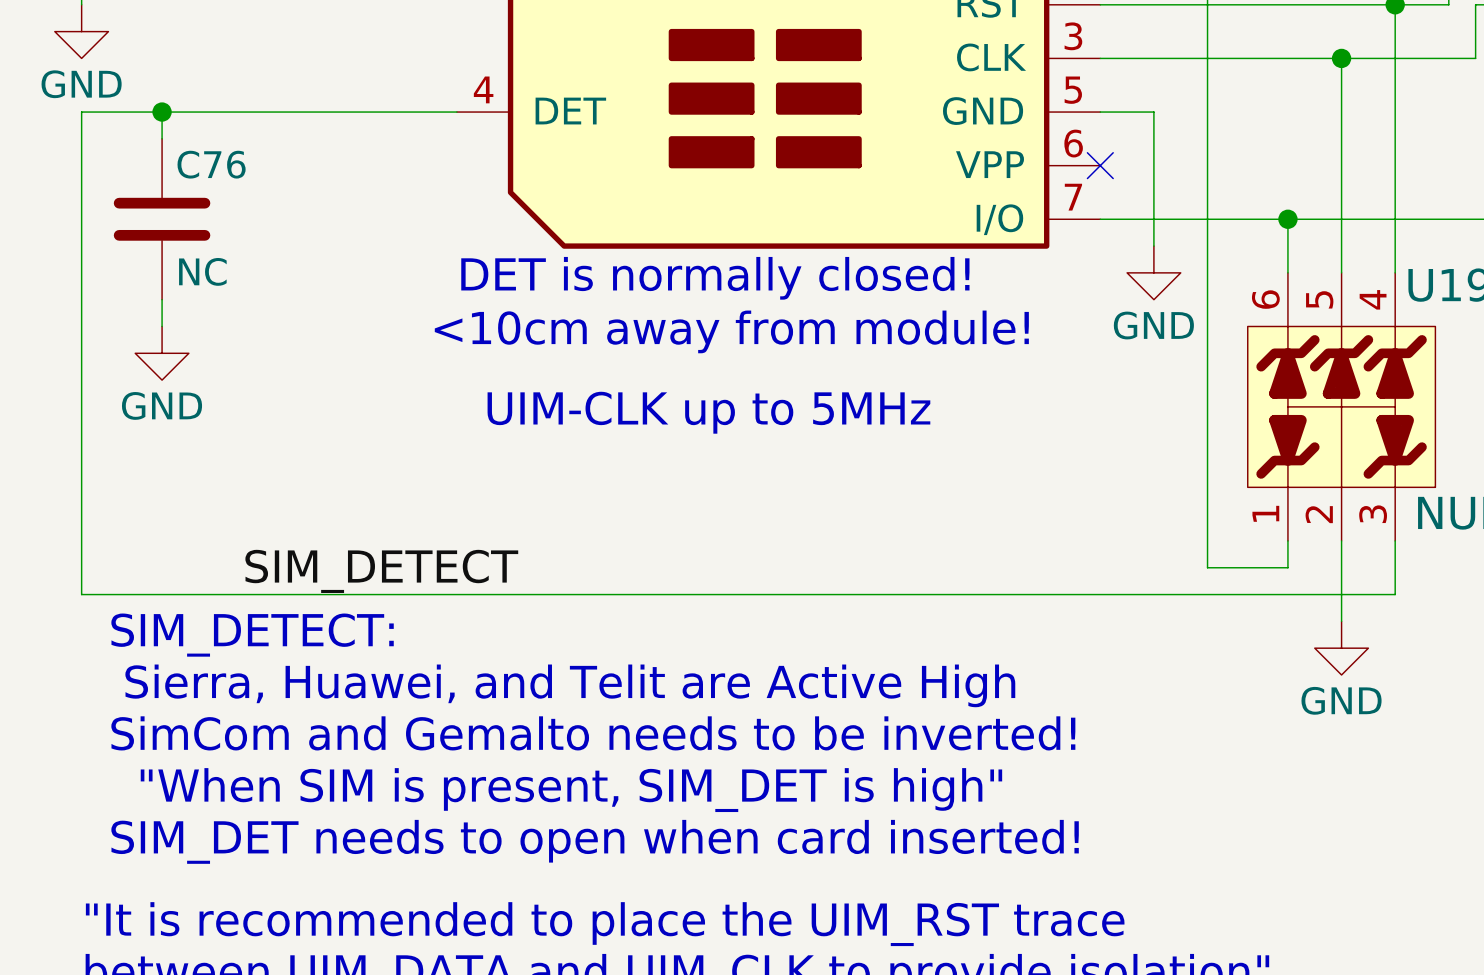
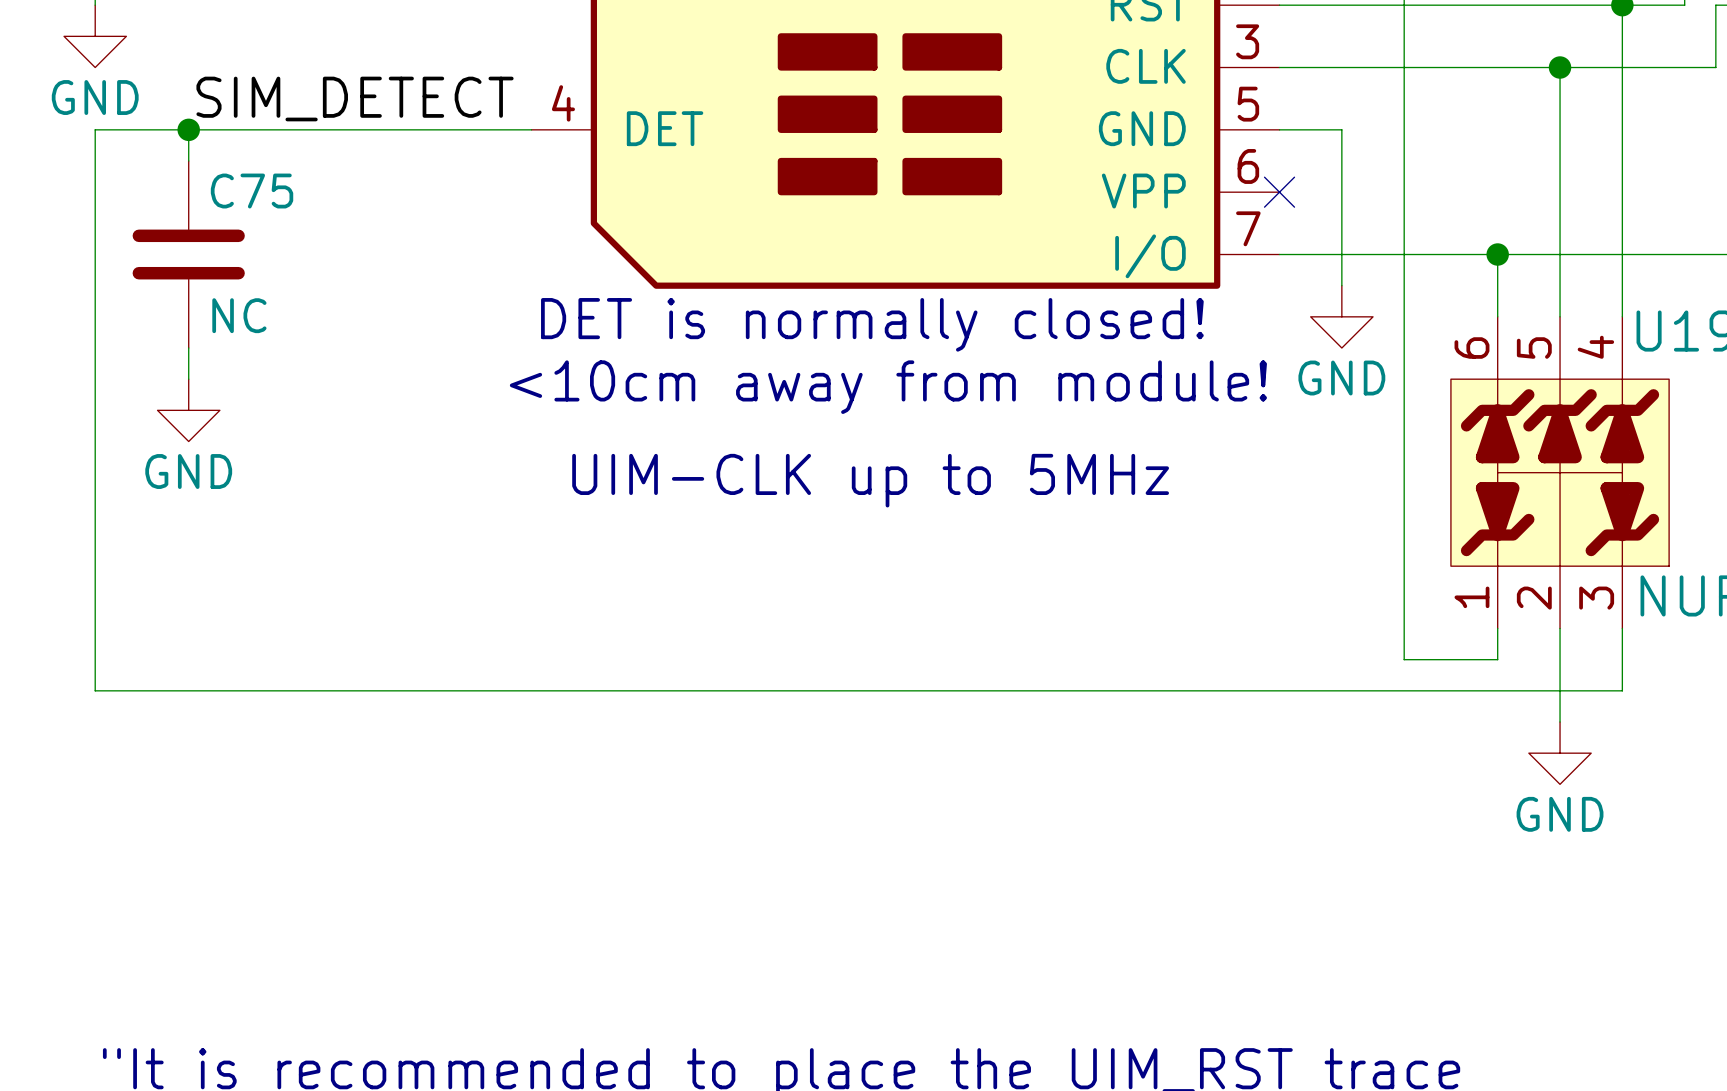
C76 name: C76 (211, 164) -> C75 (252, 191)
label position: SIM_DETECT (381, 571) -> SIM_DETECT (355, 99)
text: SIM_DETECT: (252, 635) -> none
text: Sierra, Huawei, and Telit are Active High (570, 685) -> none
text: SimCom and Gemalto needs to be inverted! (593, 733) -> none
text: "When SIM is present, SIM_DET is high" (571, 790) -> none
text: SIM_DET needs to open when card inserted! (595, 841) -> none

